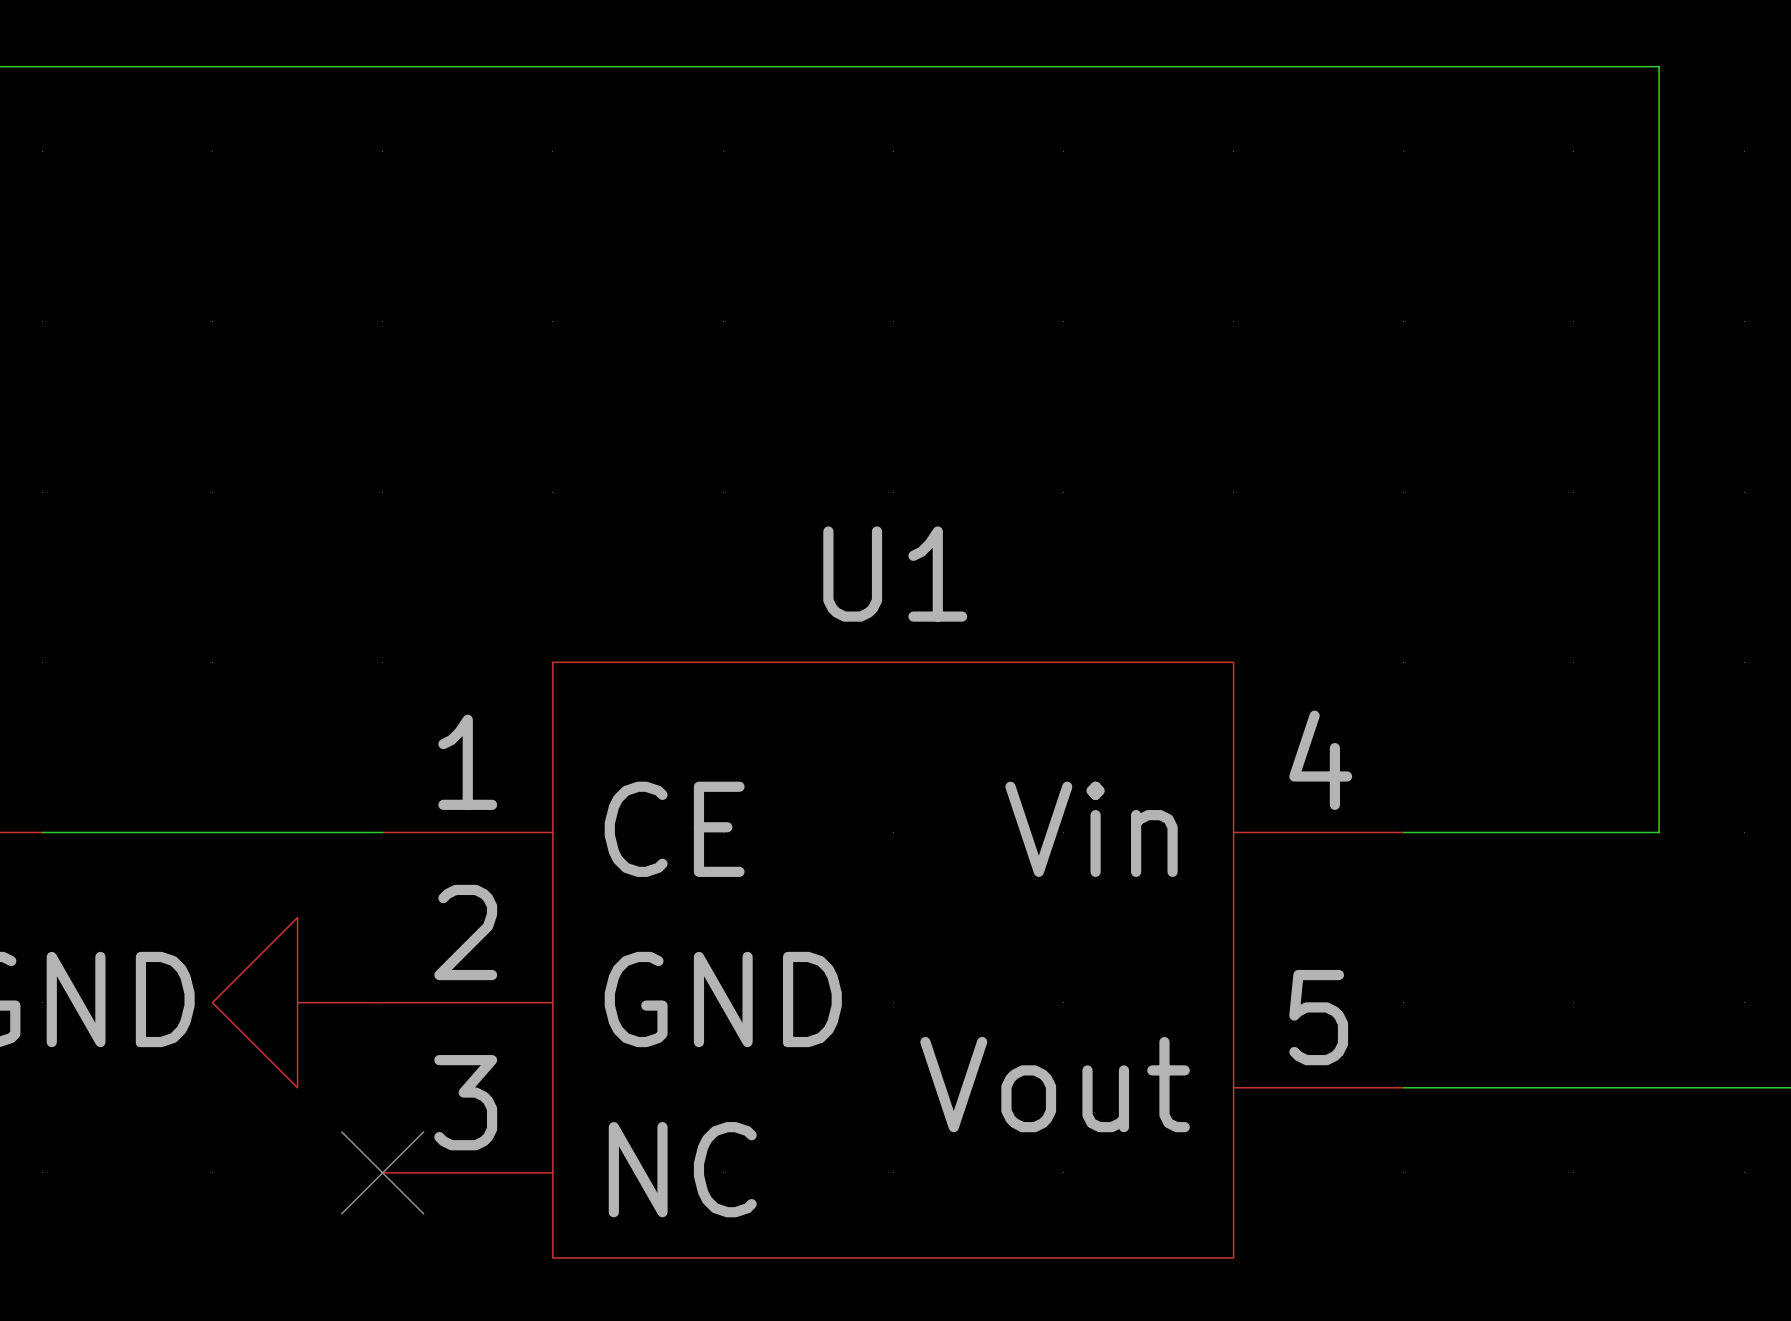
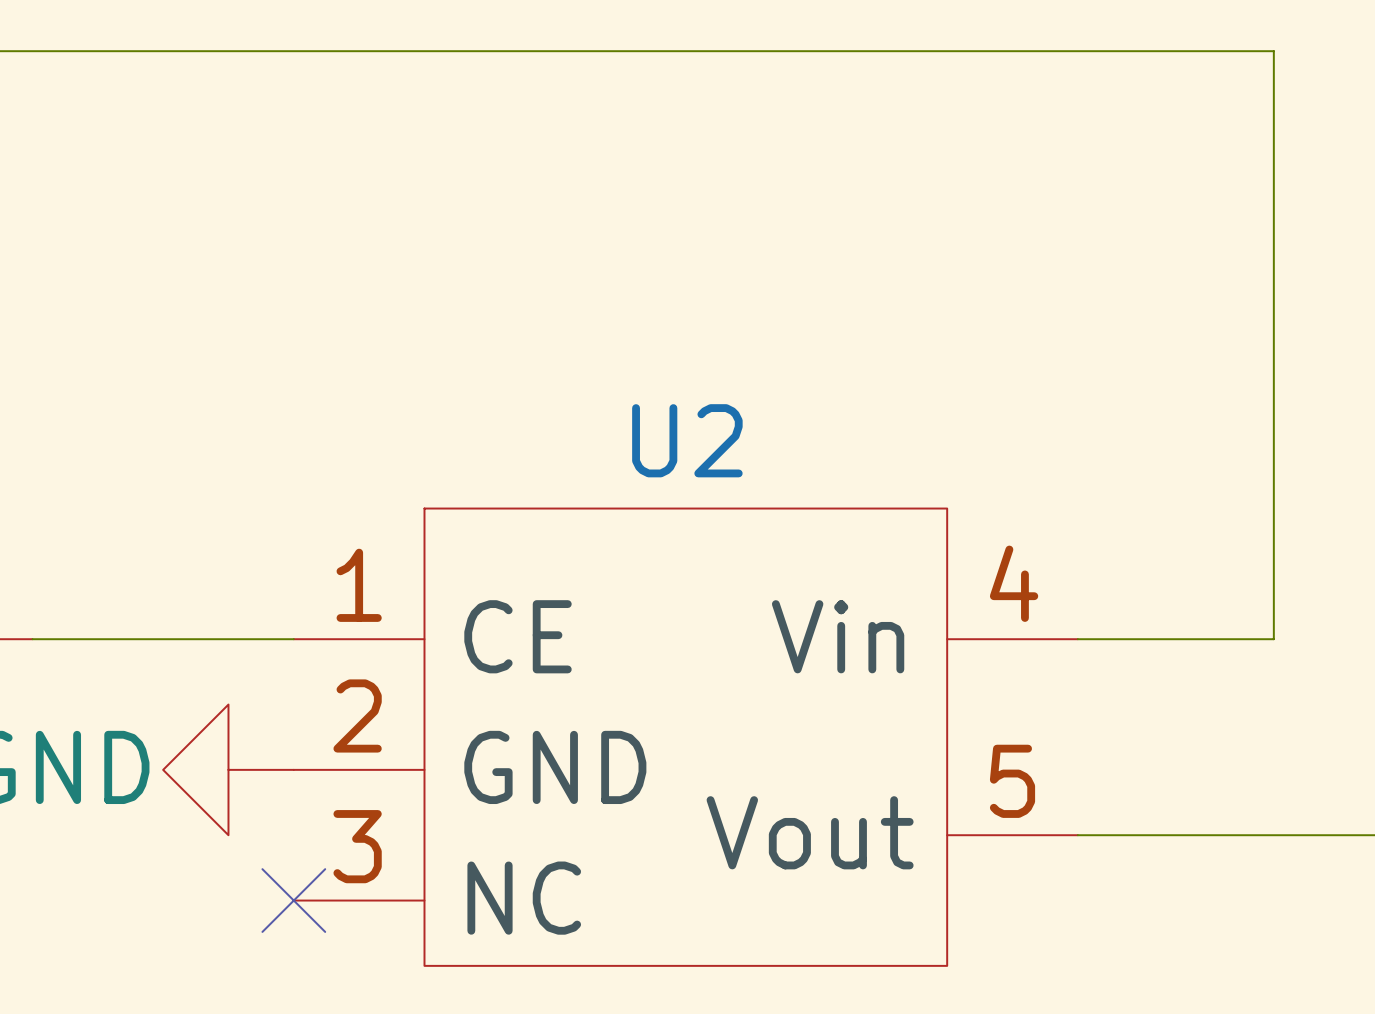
U1 name: U1 (895, 574) -> U2 (687, 440)

